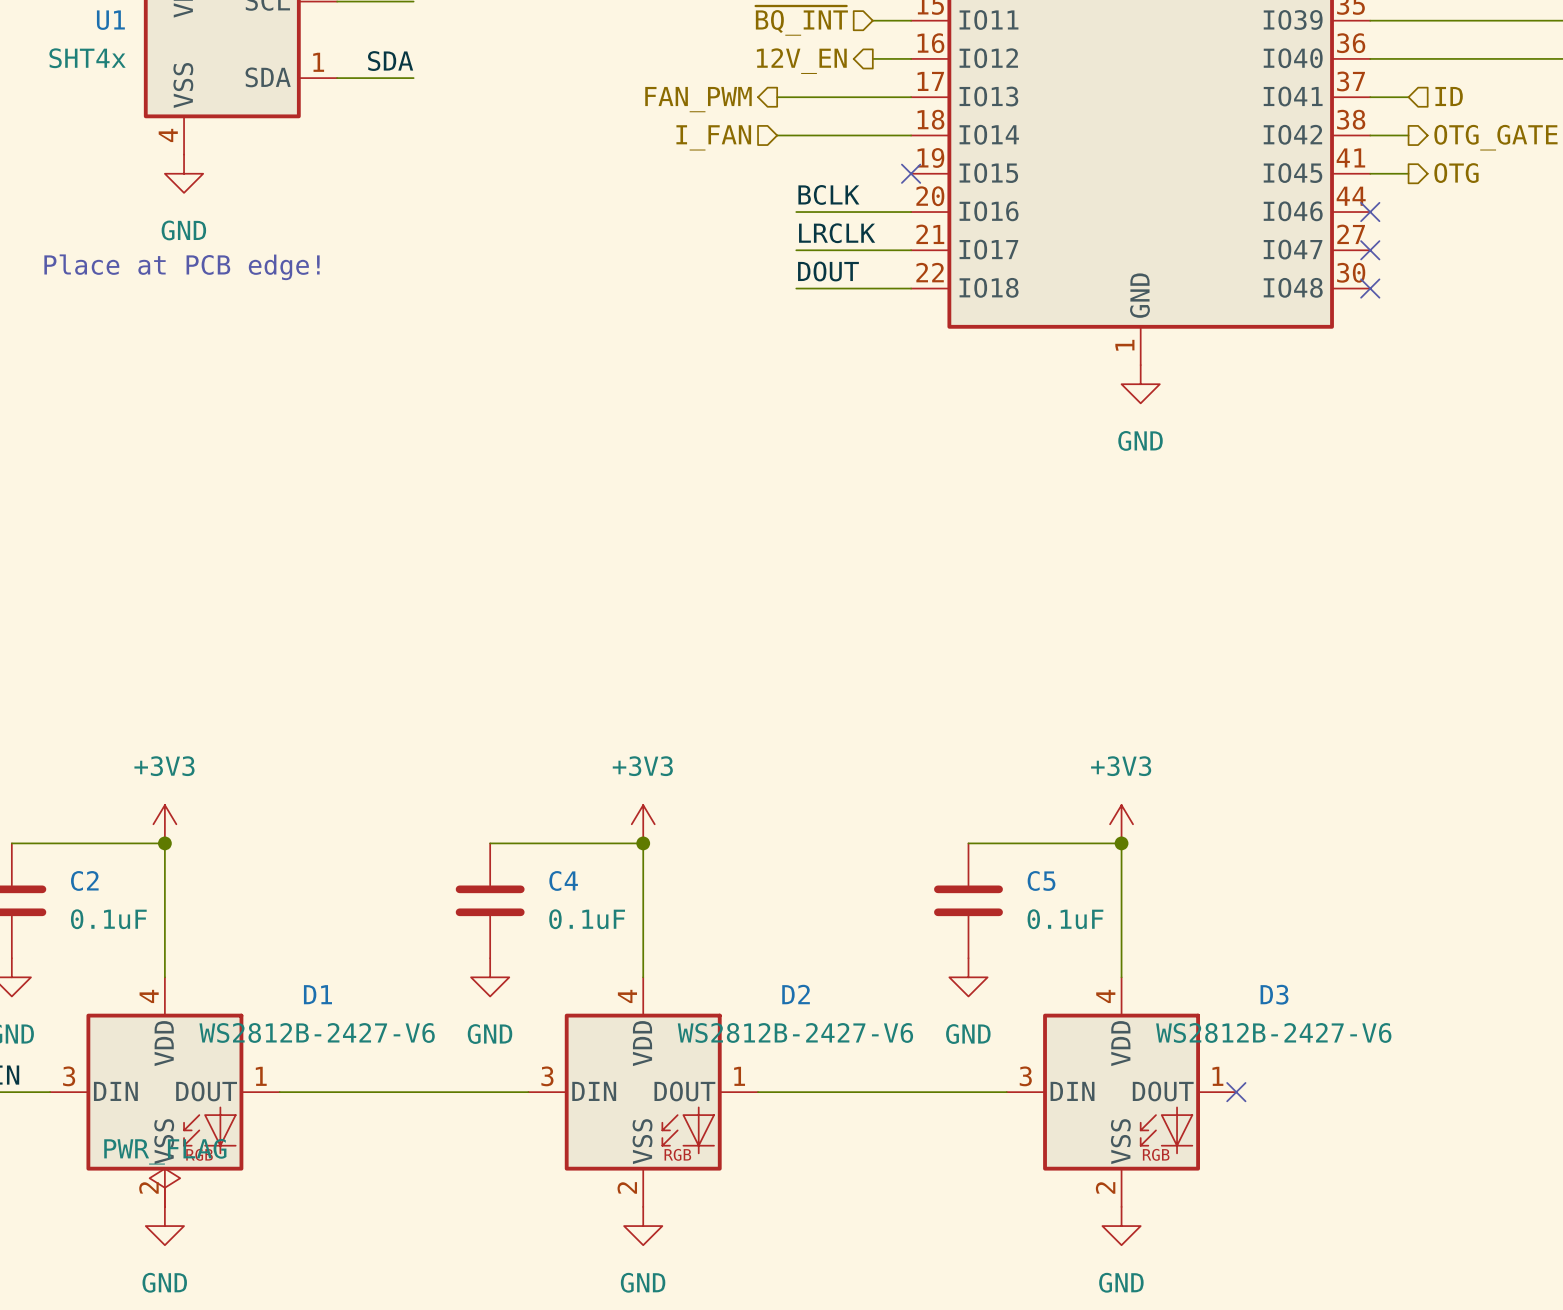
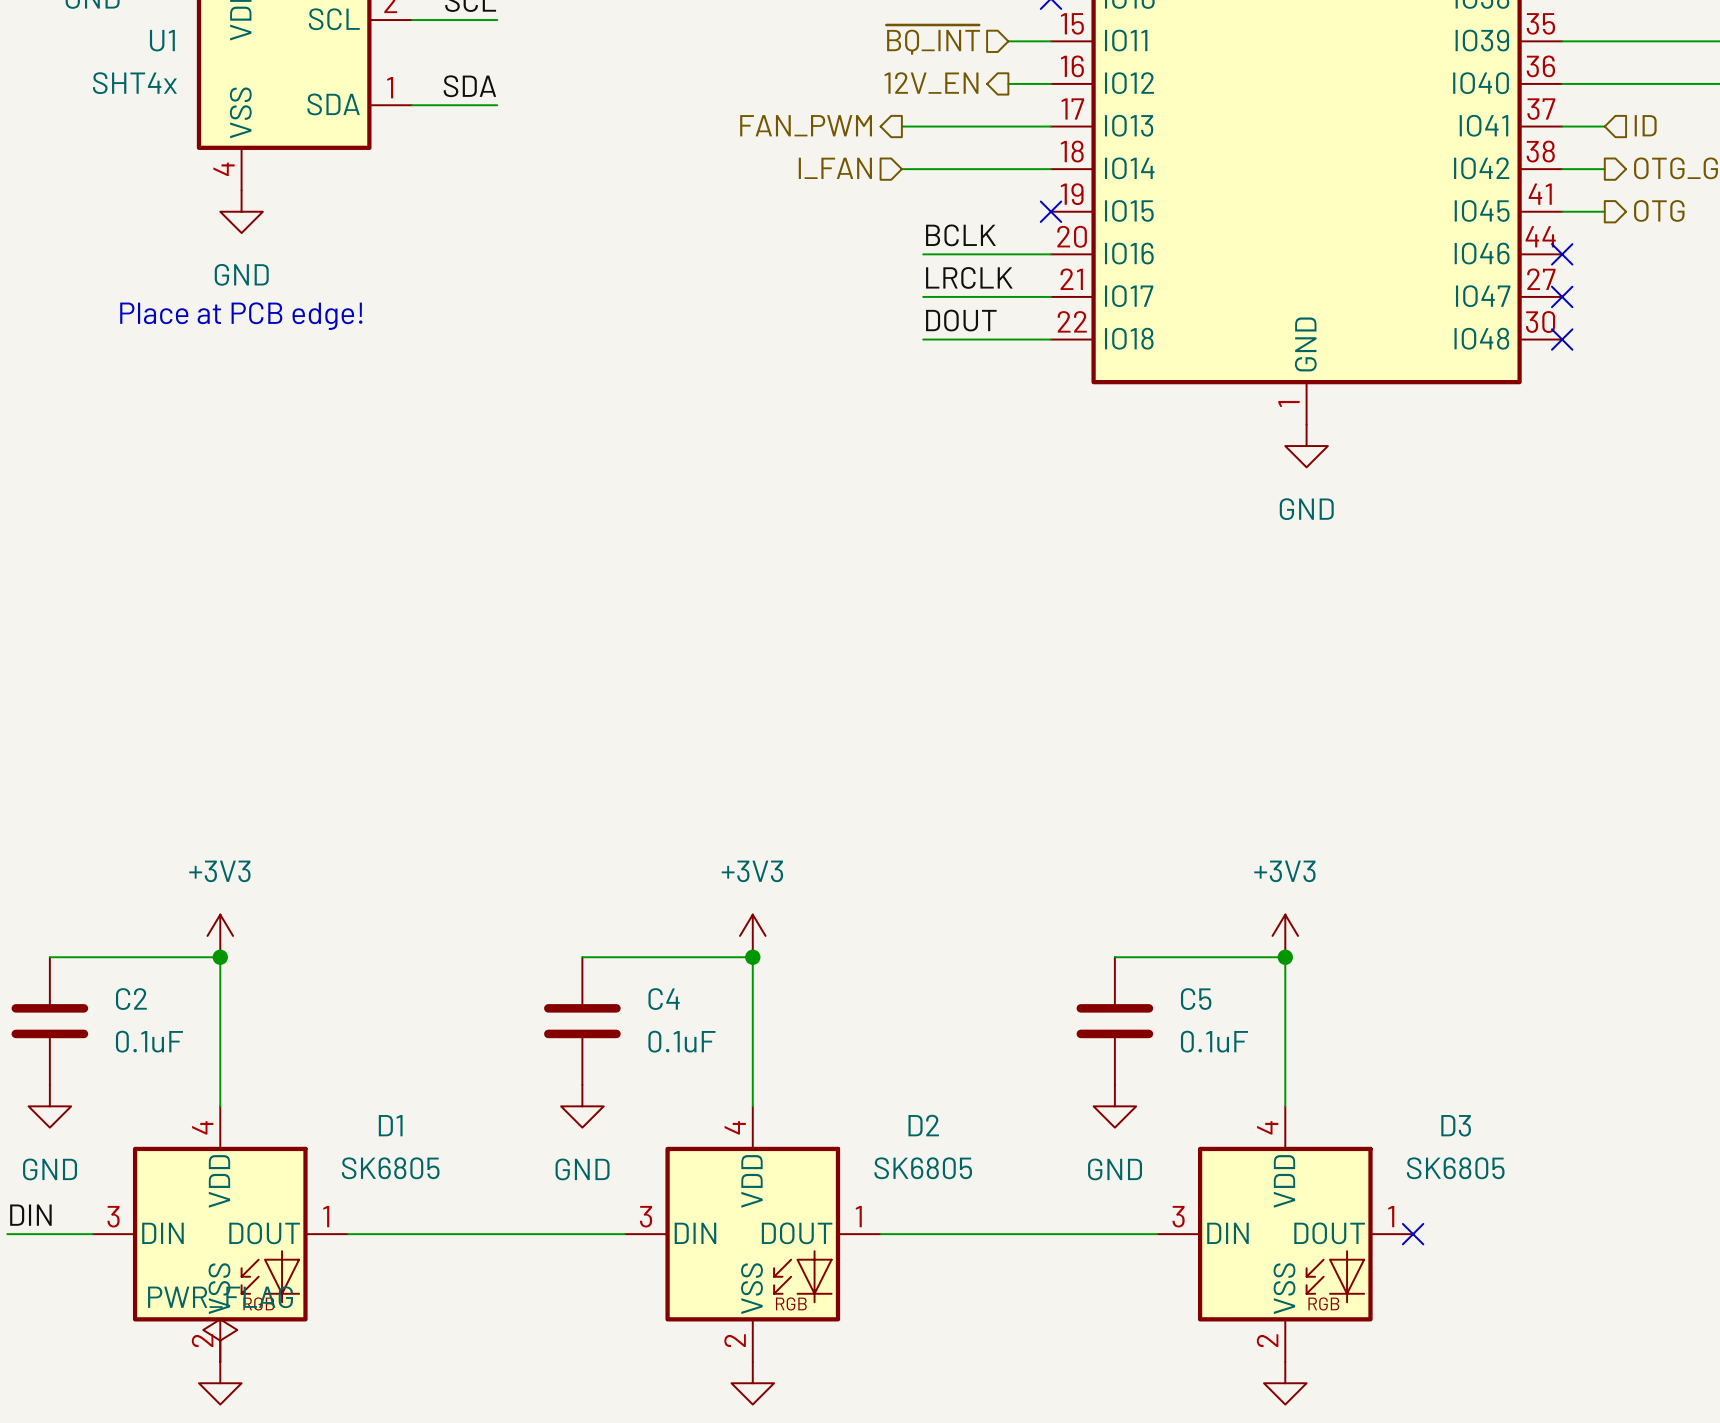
D1 value: WS2812B-2427-V6 (317, 1032) -> SK6805 (390, 1168)
D2 value: WS2812B-2427-V6 (795, 1032) -> SK6805 (923, 1168)
D3 value: WS2812B-2427-V6 (1273, 1032) -> SK6805 (1455, 1168)

